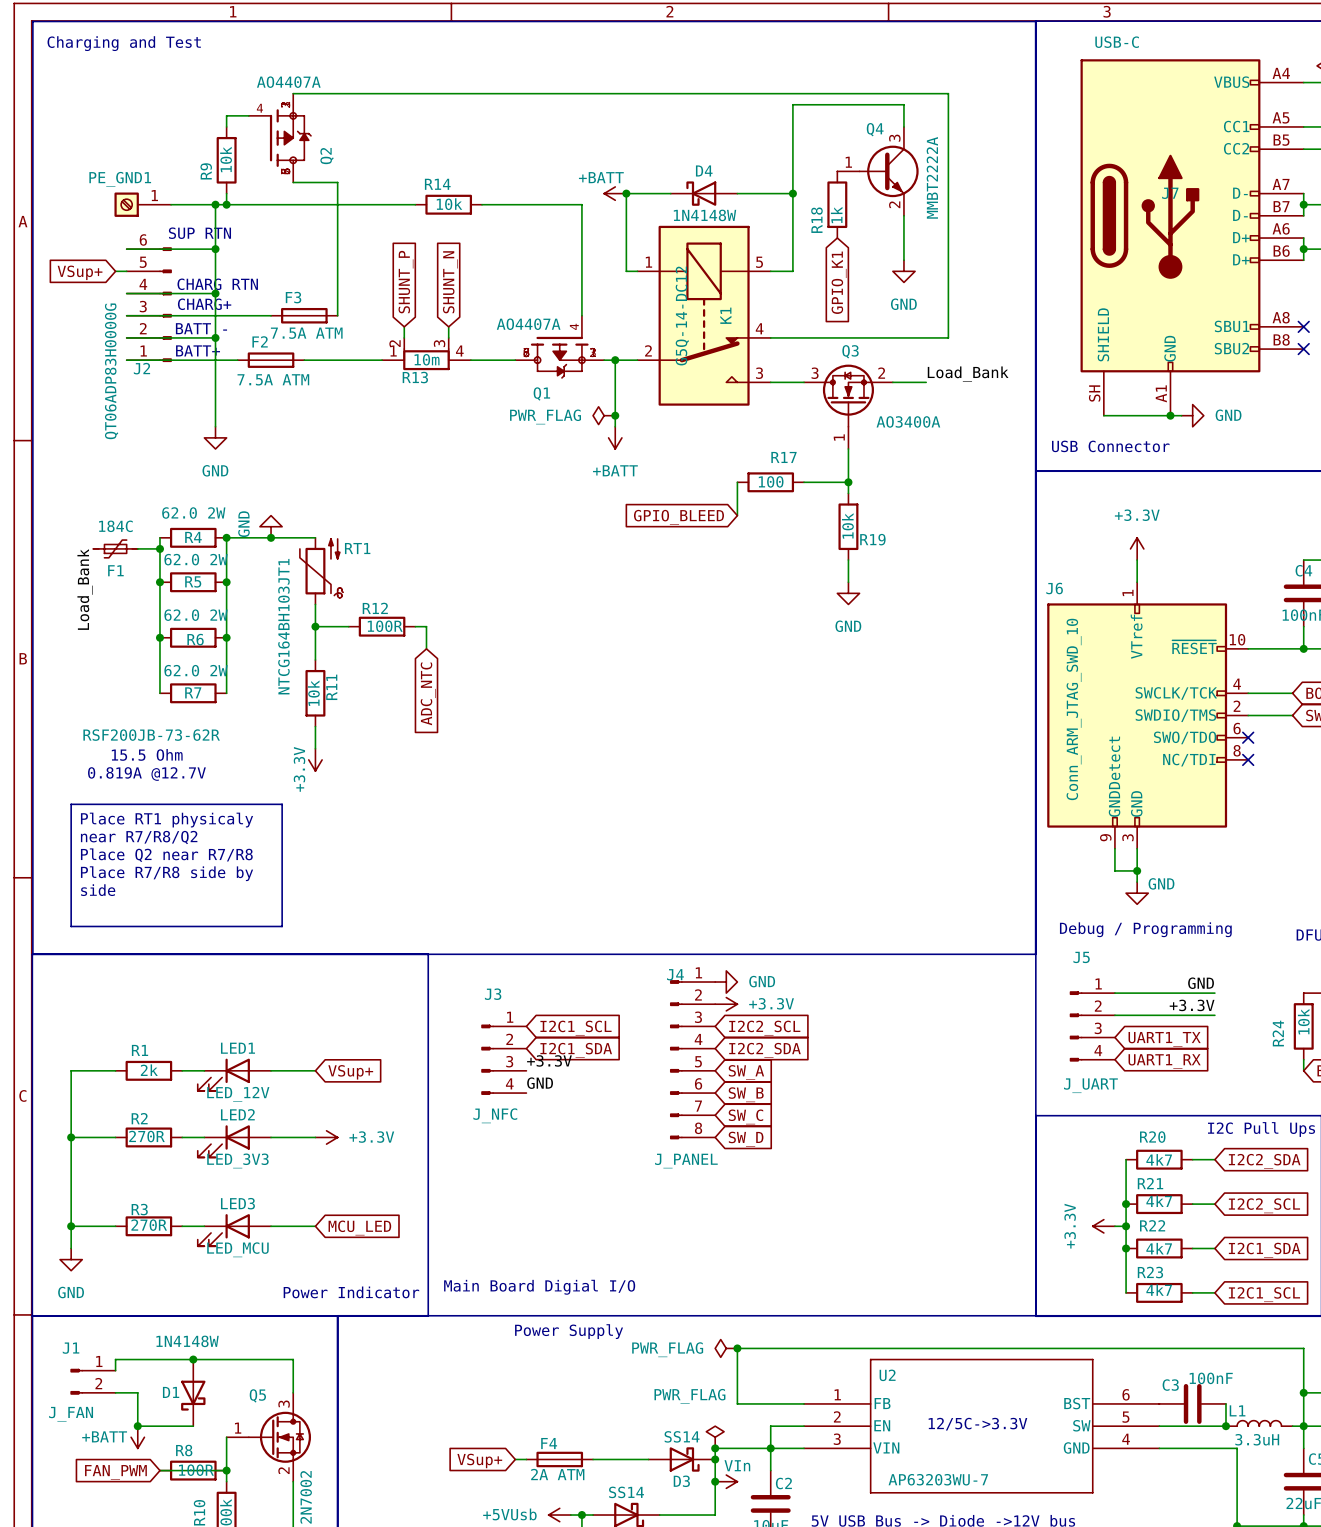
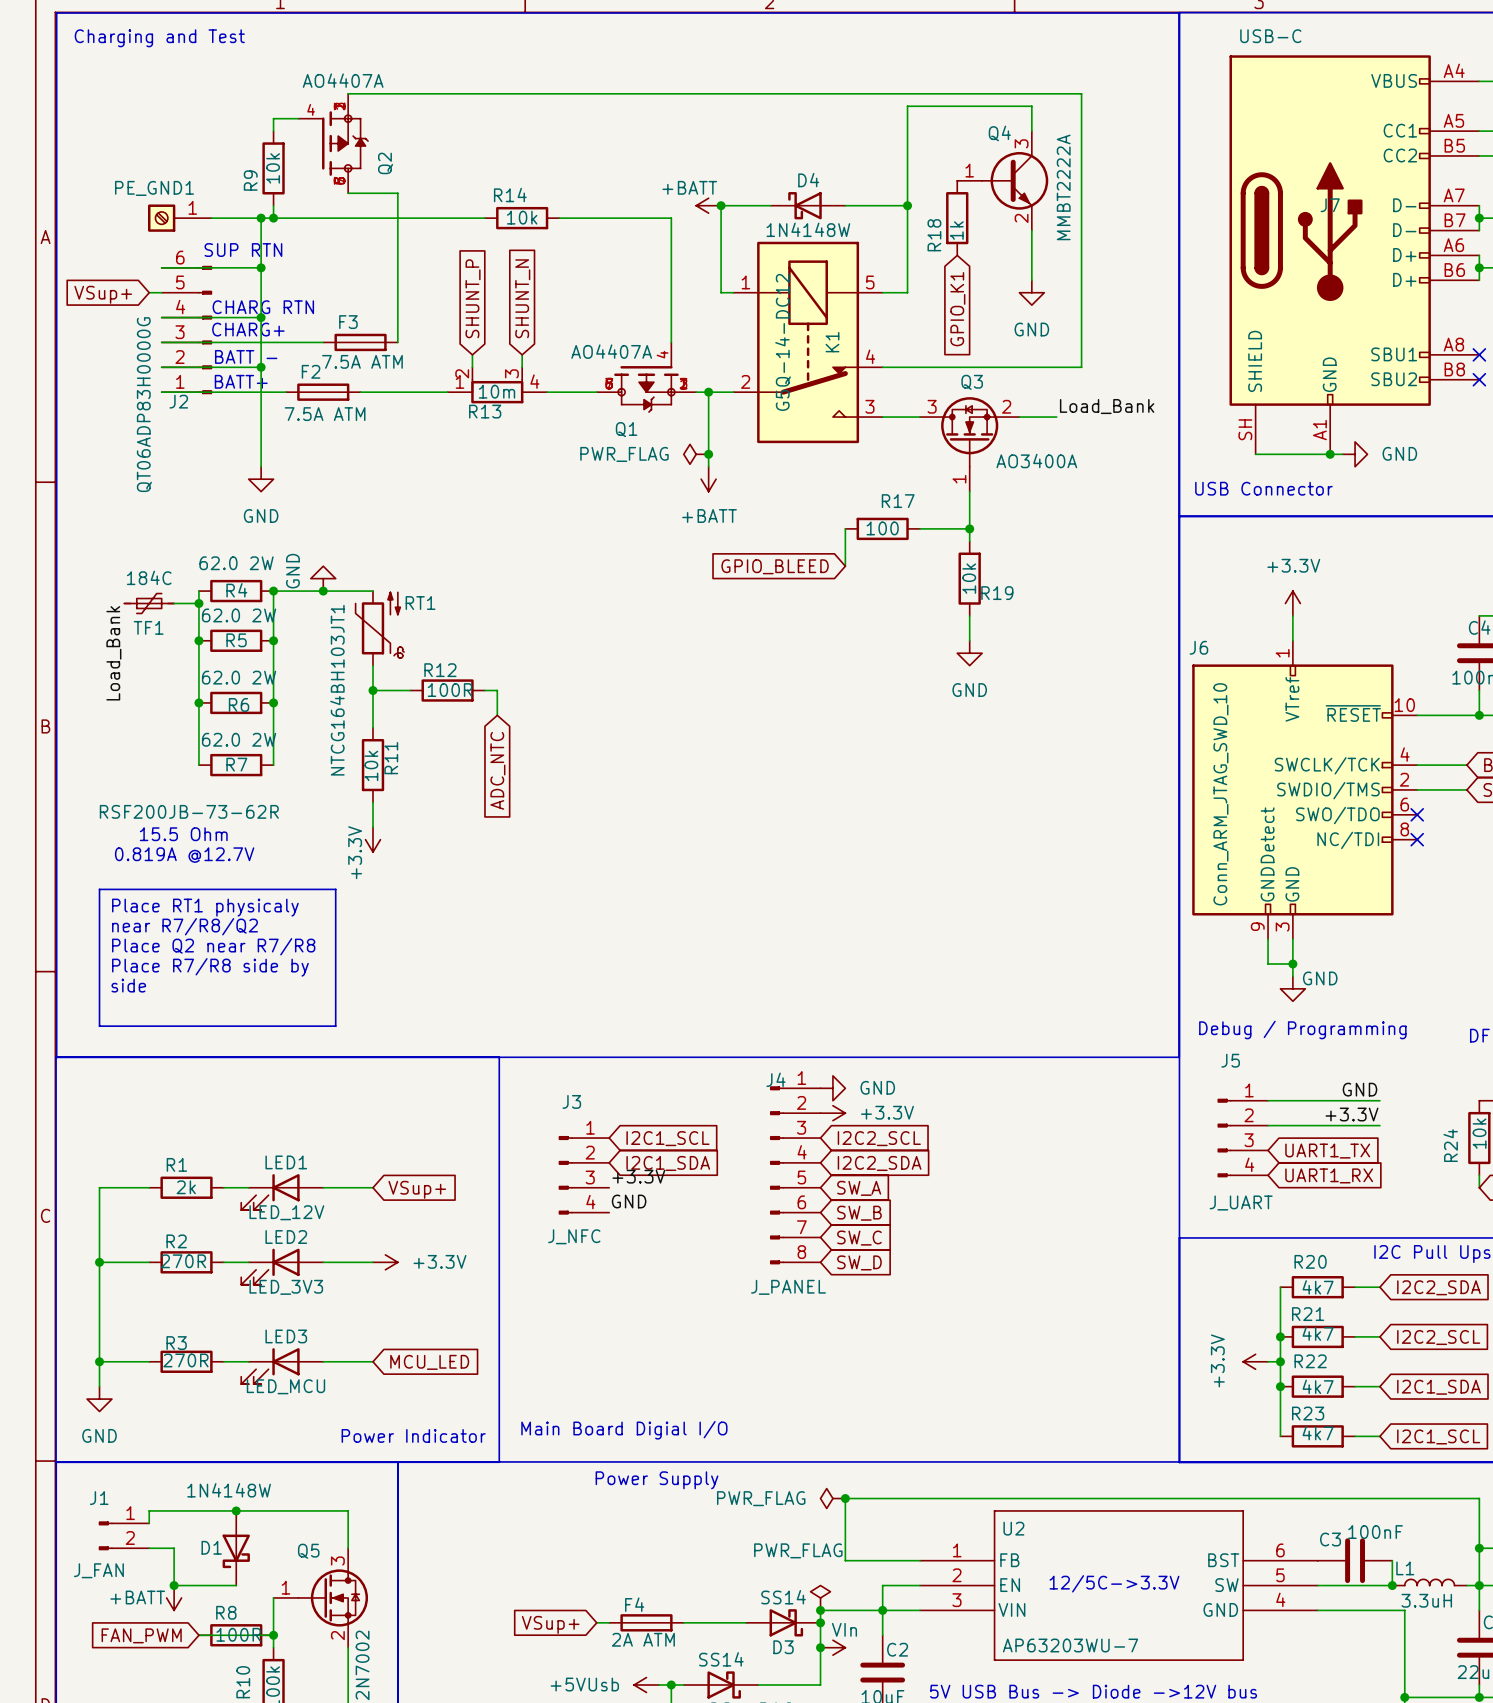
F1 name: F1 (115, 570) -> TF1 (148, 627)

